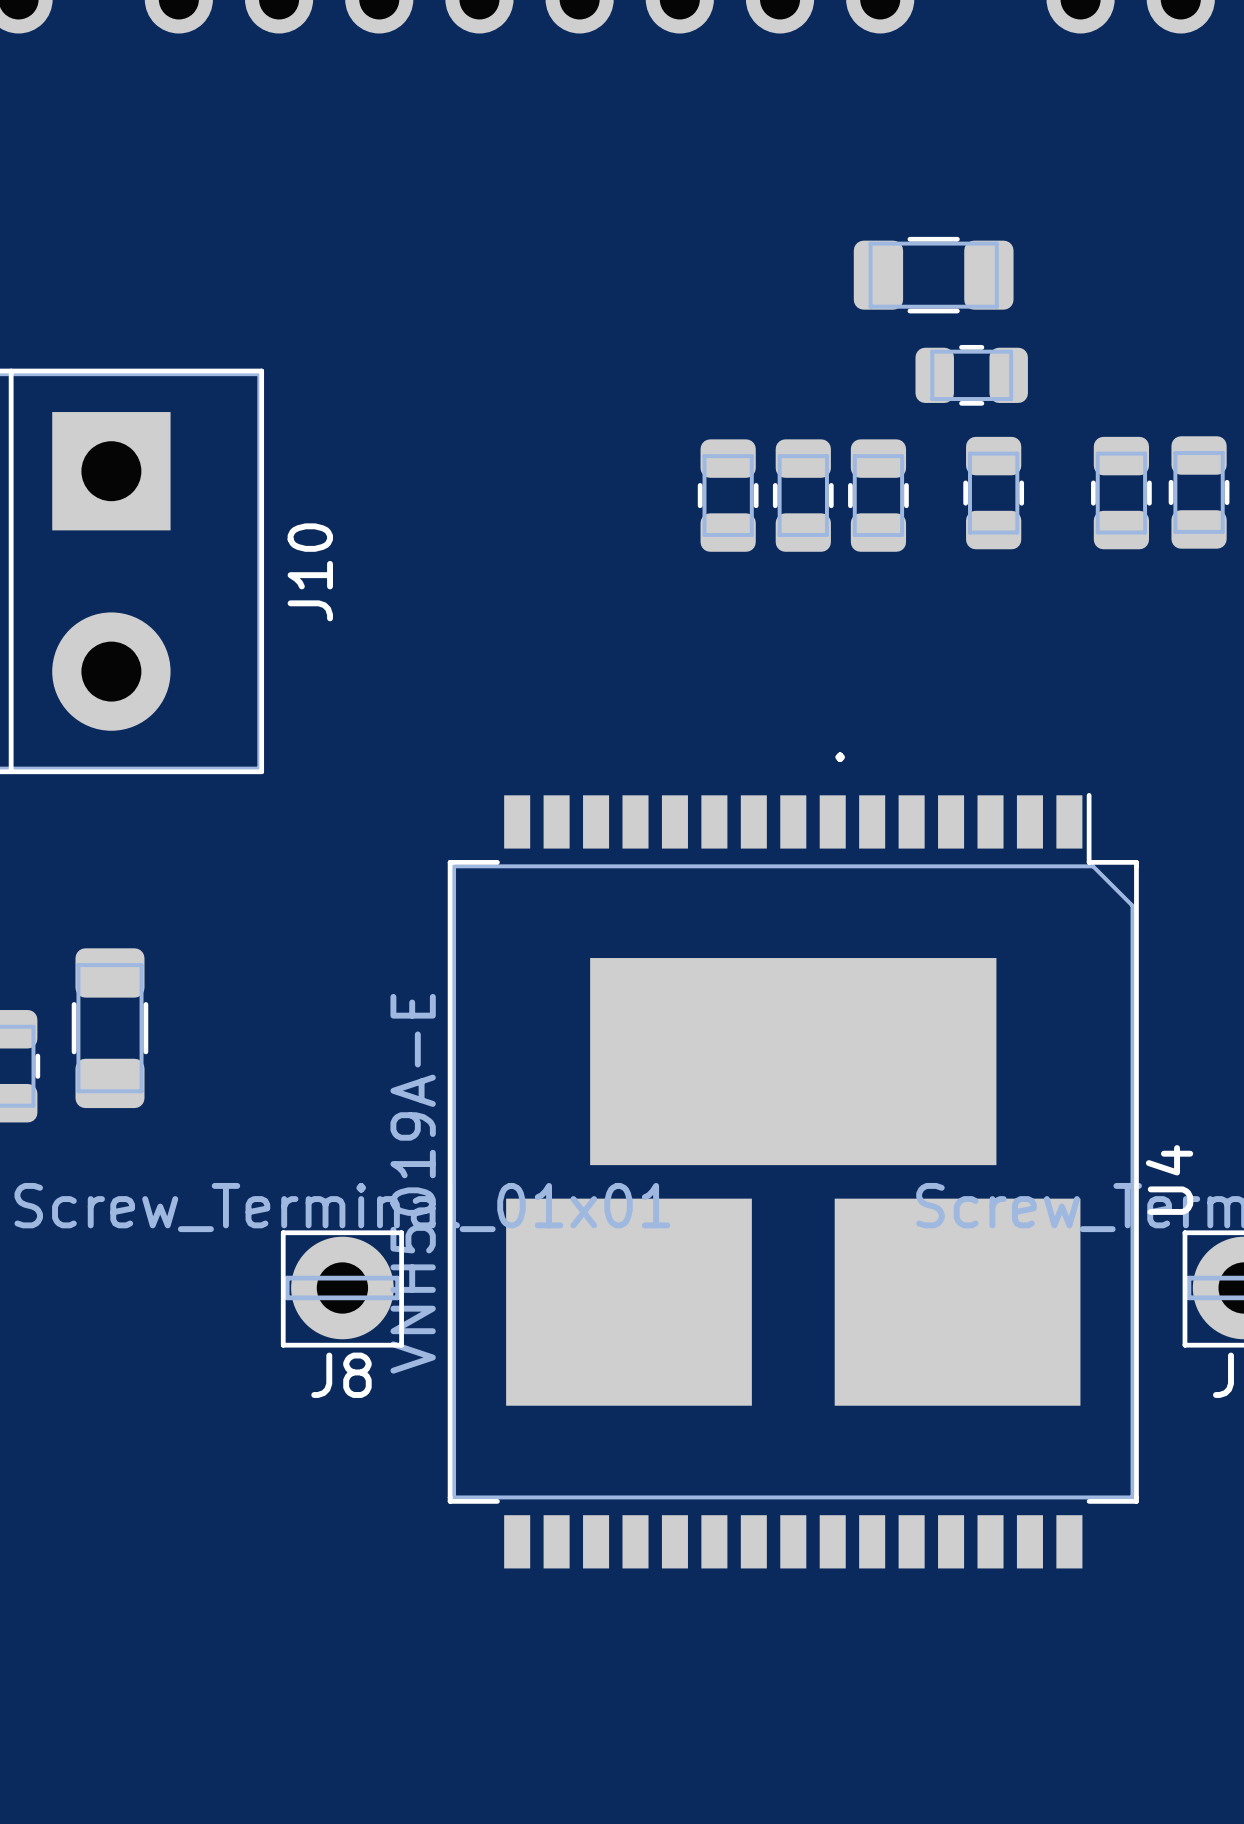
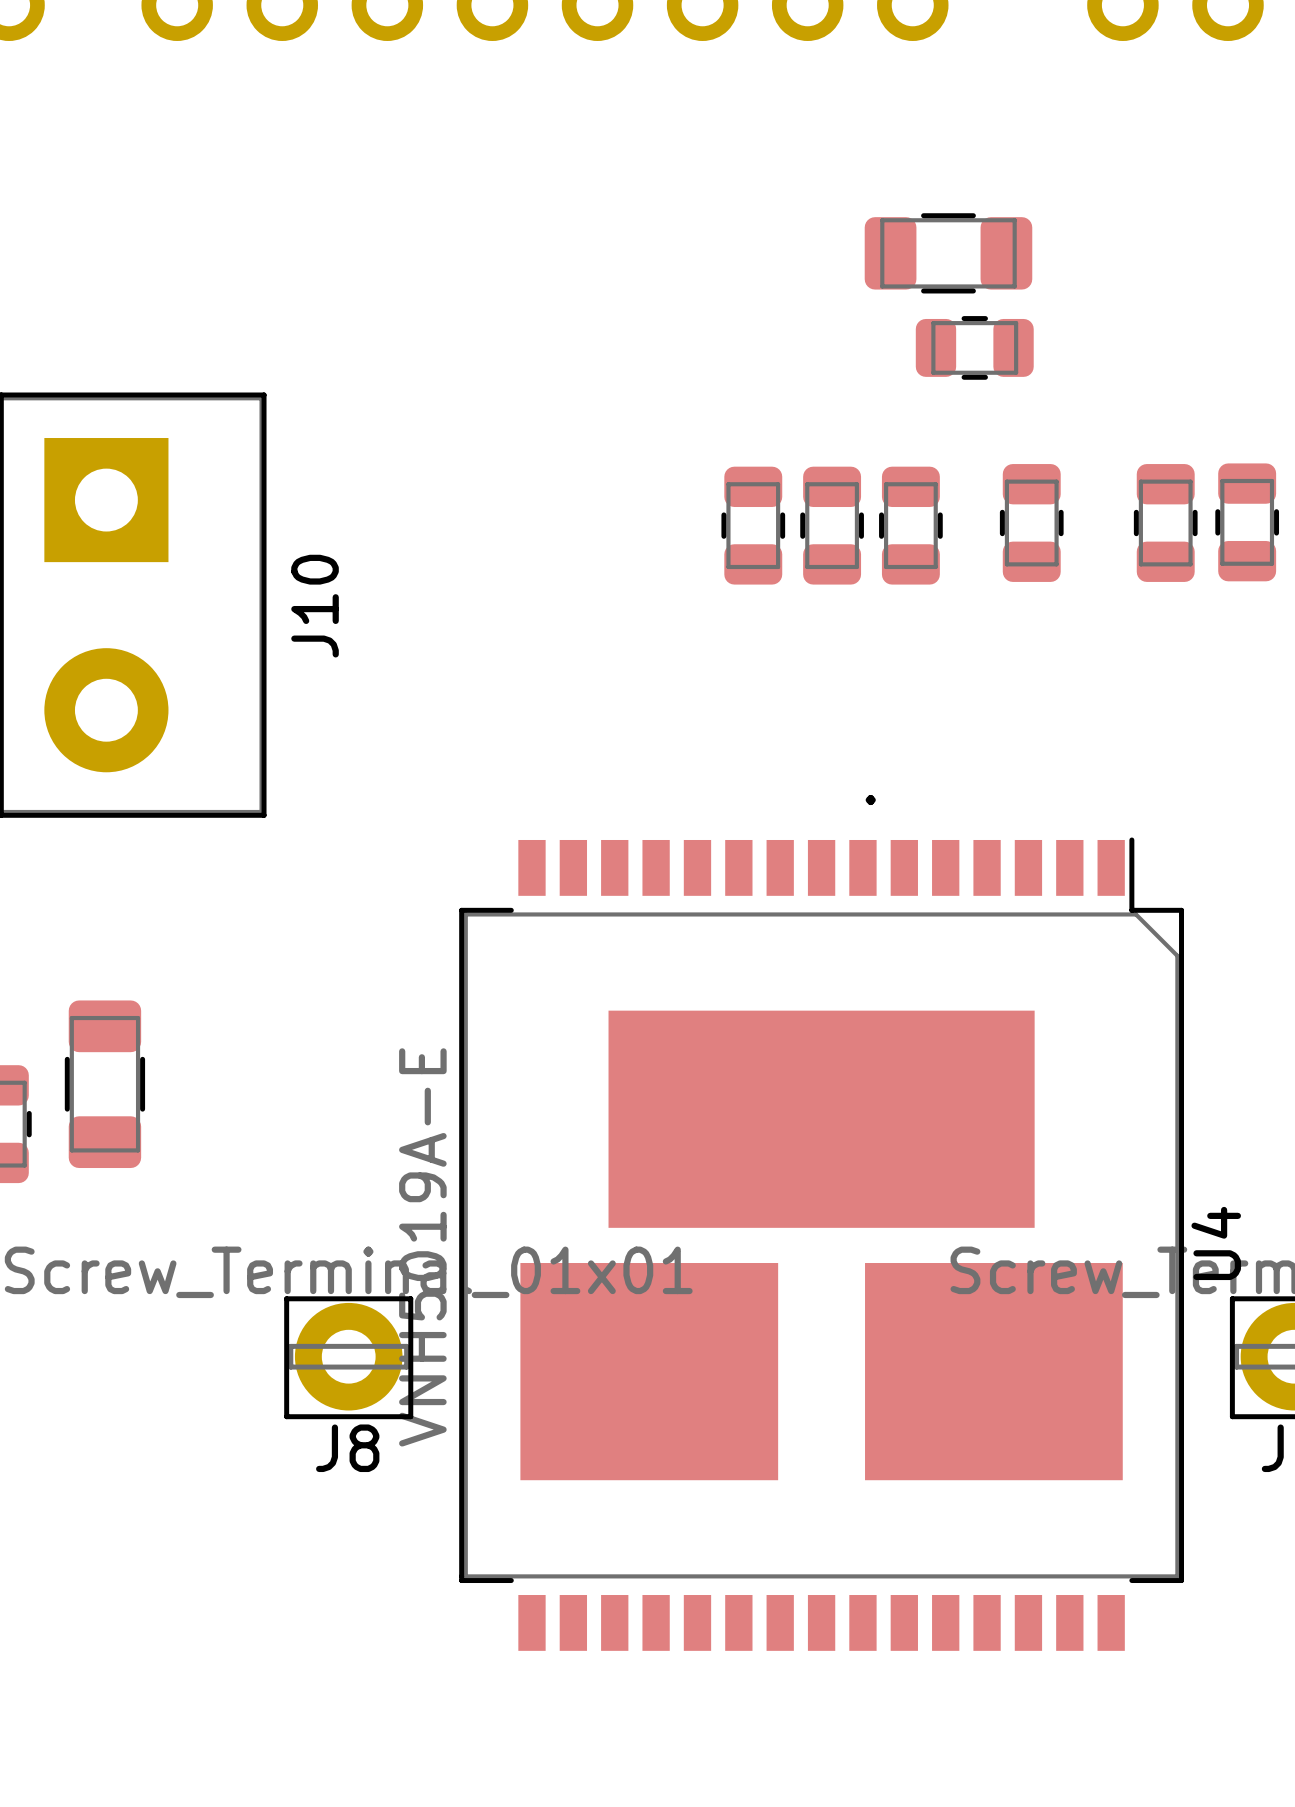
part position: (933, 275) -> (948, 253)
part position: (971, 375) -> (974, 347)

